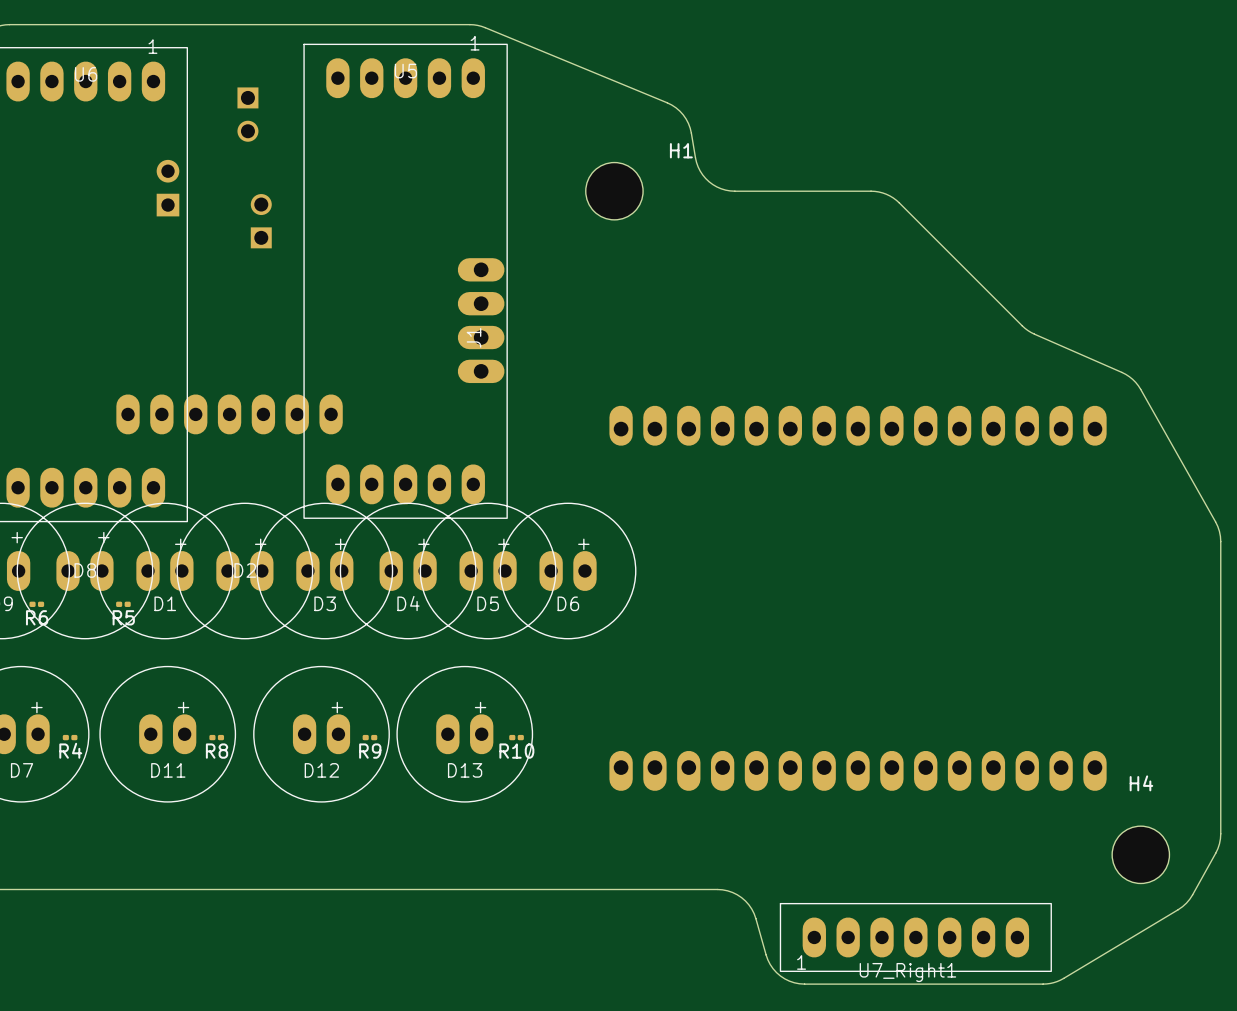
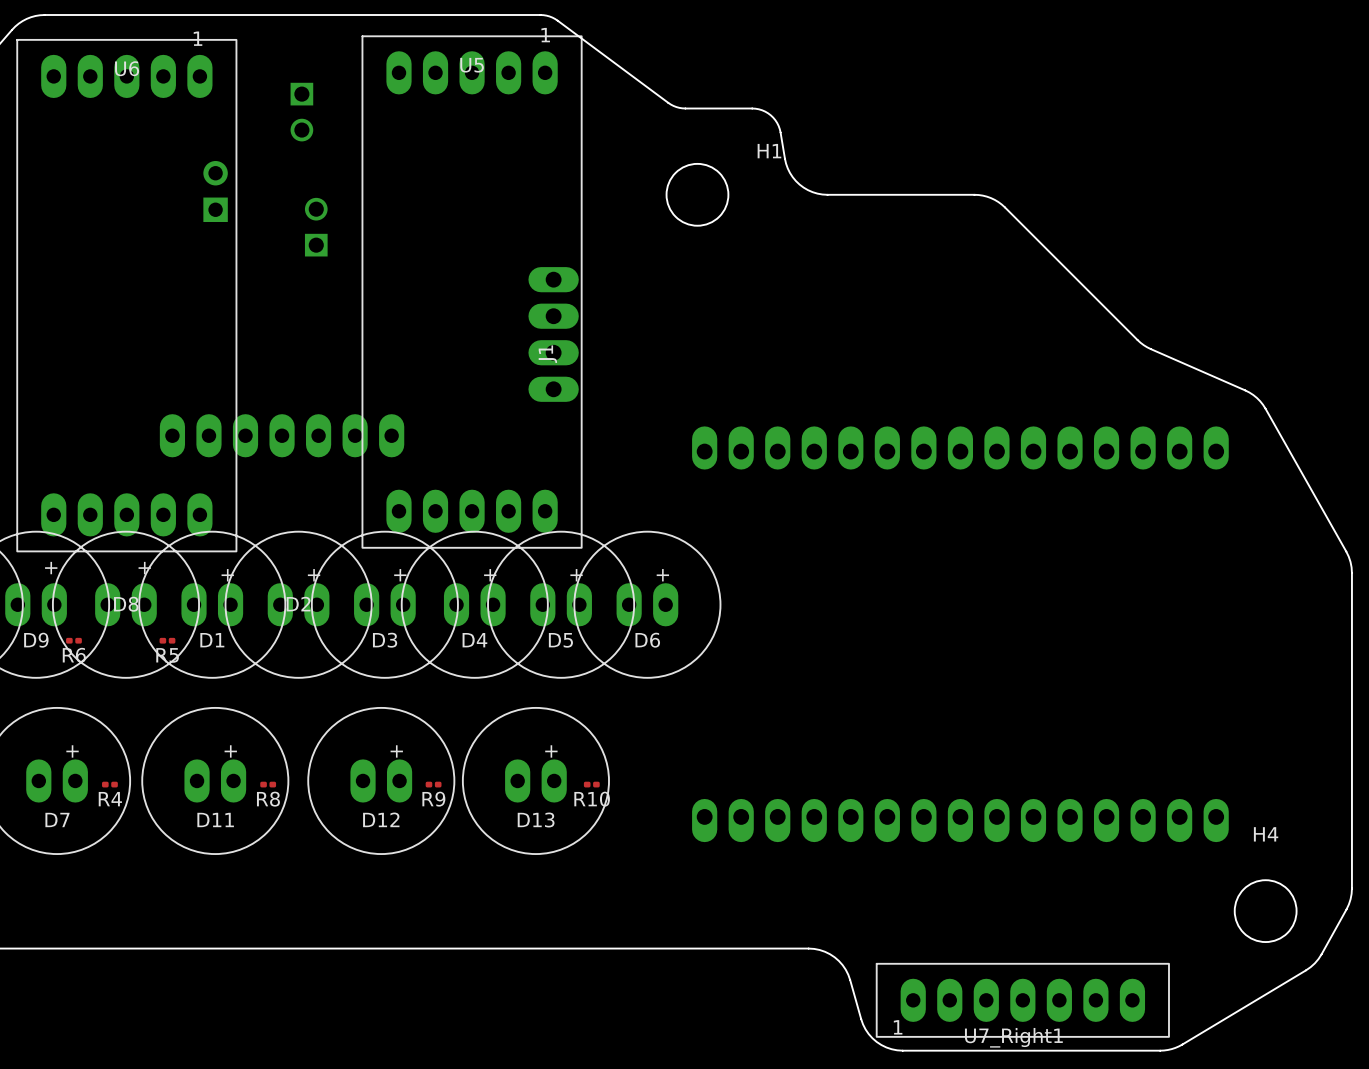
board edge: (469, 24) (485, 27) (671, 105) (686, 118) (691, 133) -> (540, 15) (557, 20) (673, 105) (685, 108) (758, 109) (773, 117) (780, 132)

